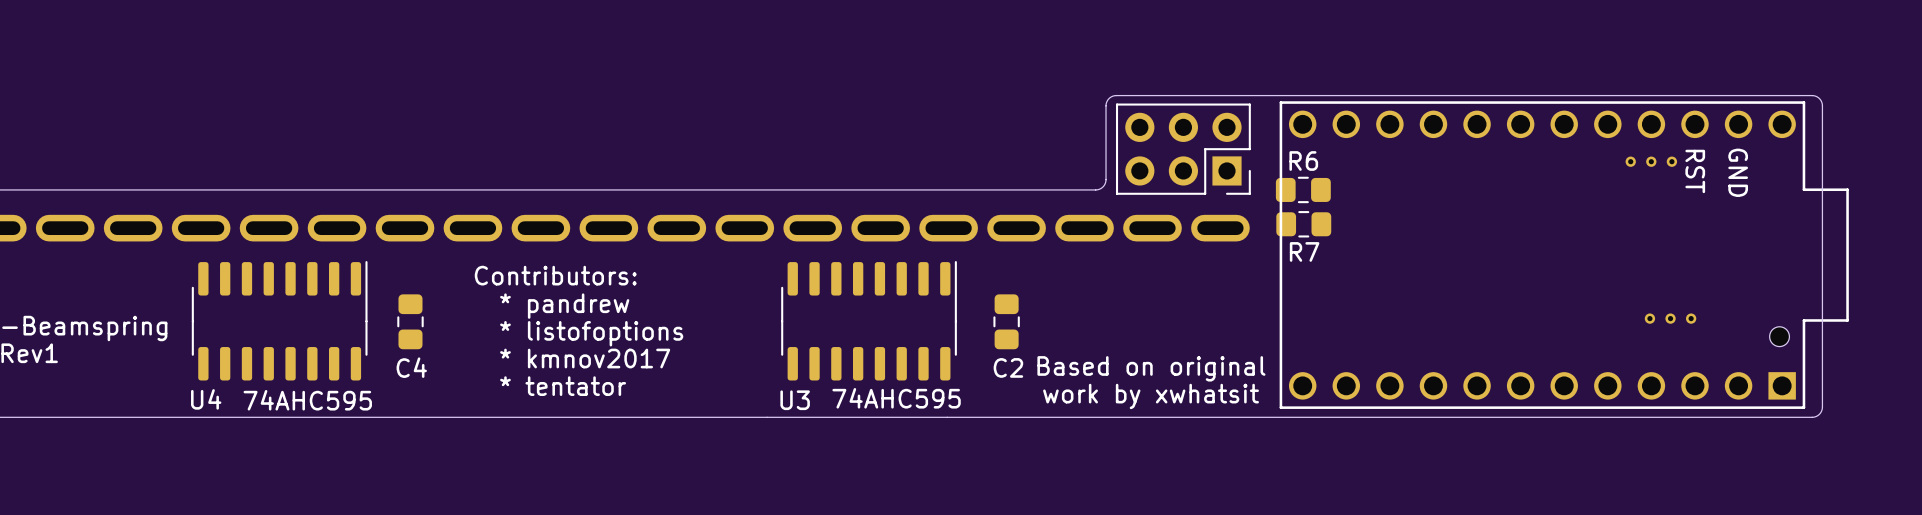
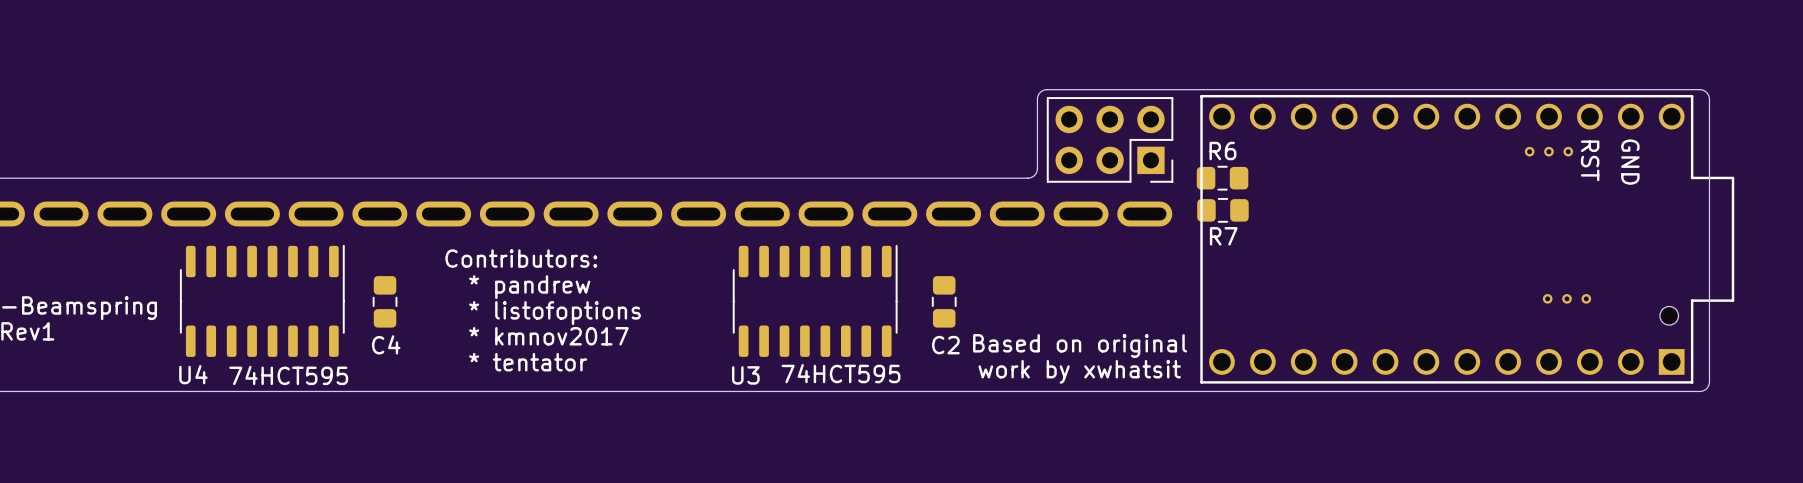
U3 value: 74AHC595 (896, 398) -> 74HCT595 (840, 373)
U4 value: 74AHC595 (307, 400) -> 74HCT595 (288, 375)

